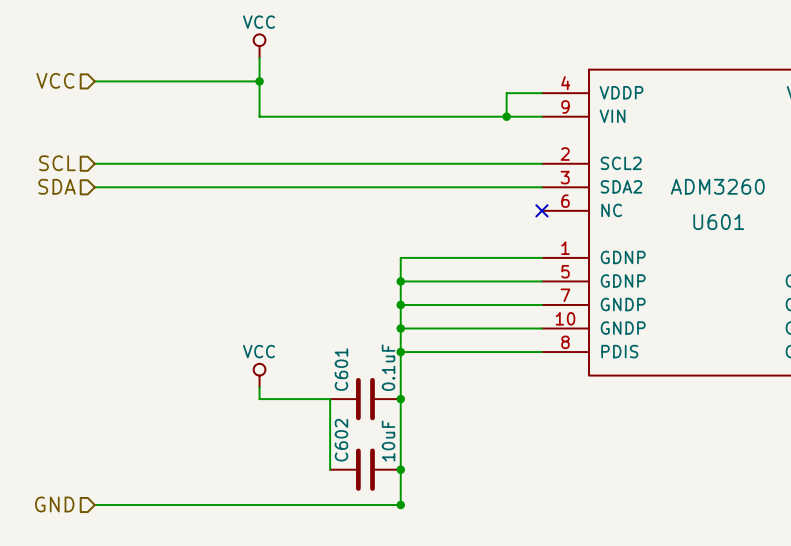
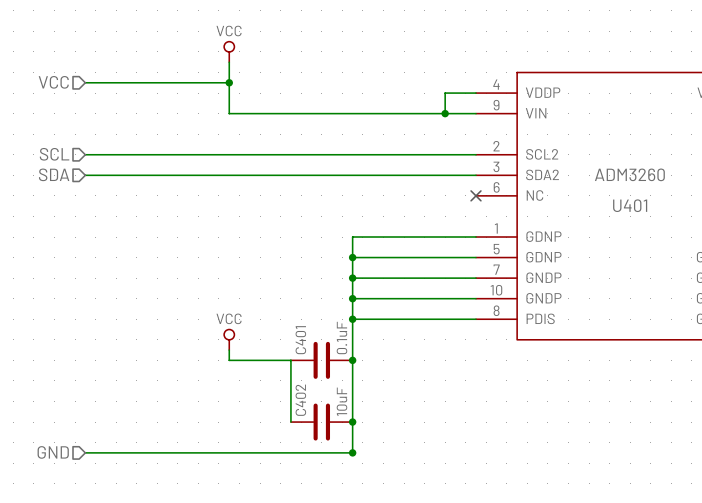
U601 name: U601 (718, 222) -> U401 (630, 205)
C601 name: C601 (341, 369) -> C401 (300, 340)
C602 name: C602 (341, 440) -> C402 (300, 400)

